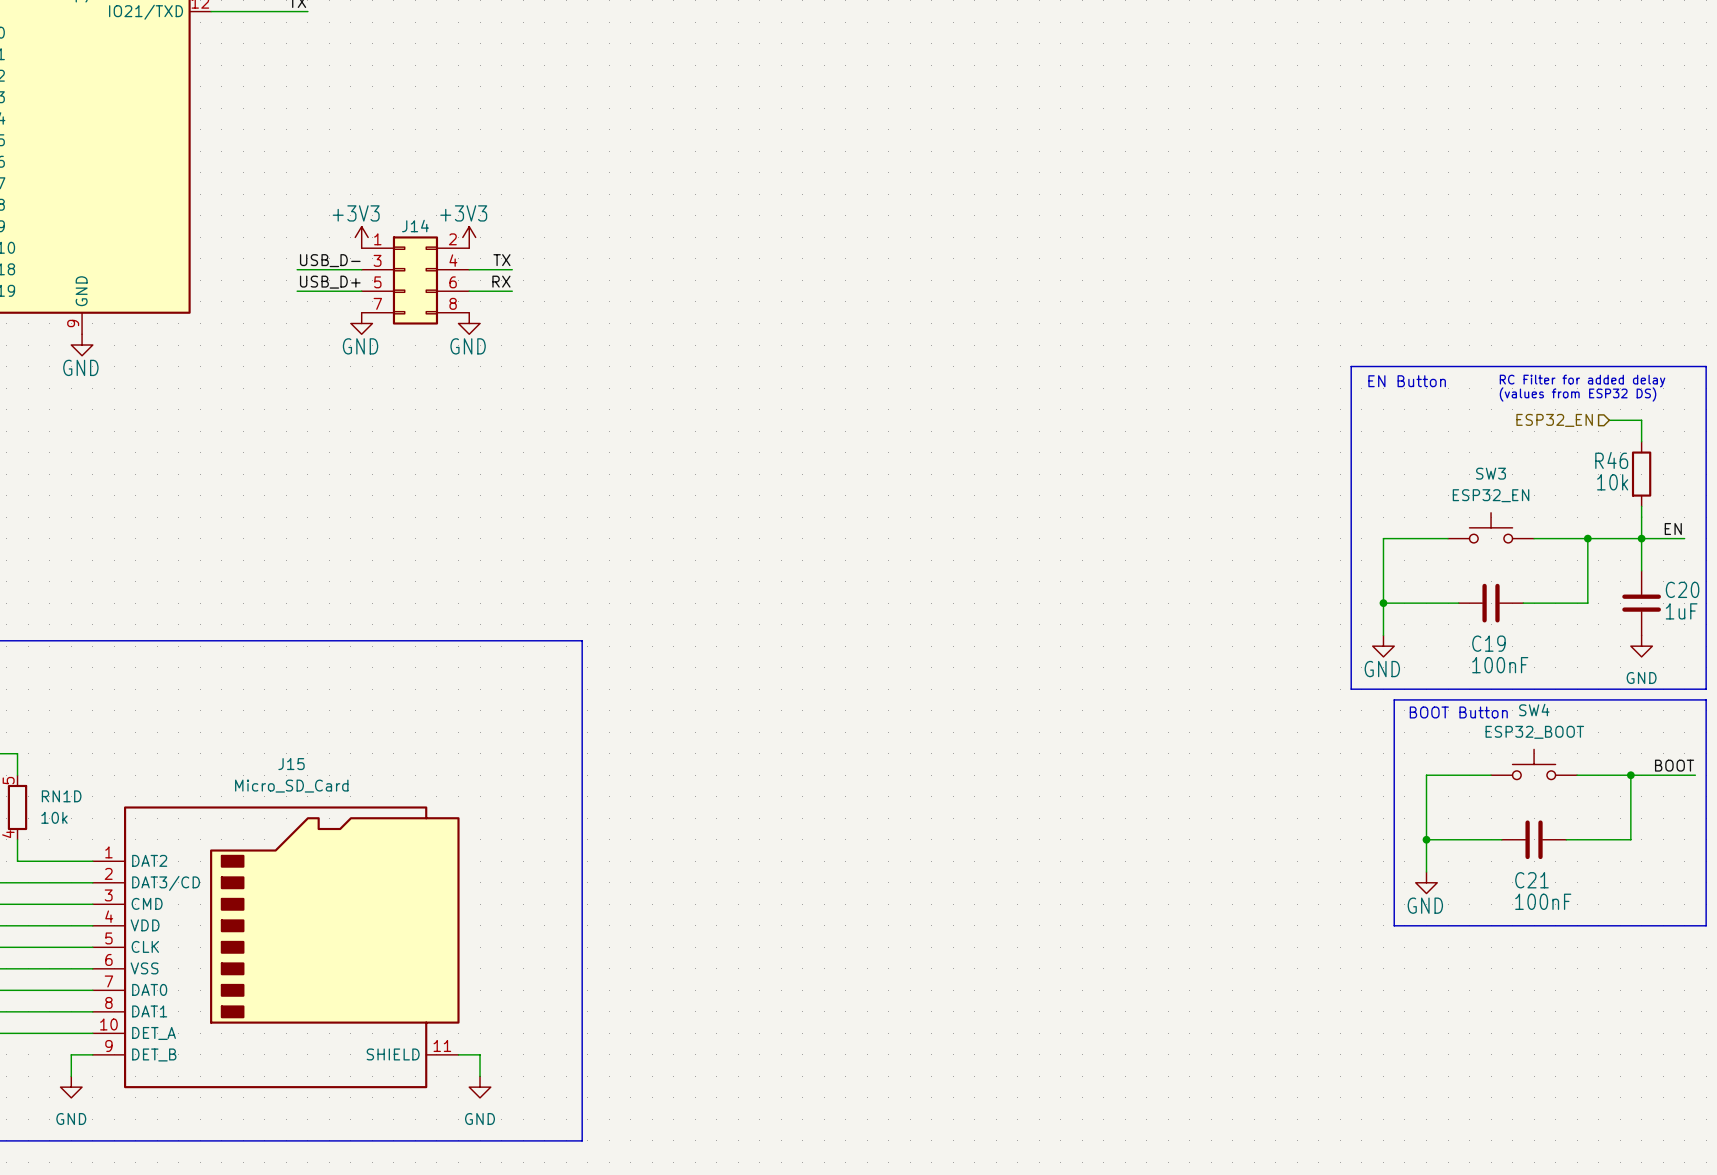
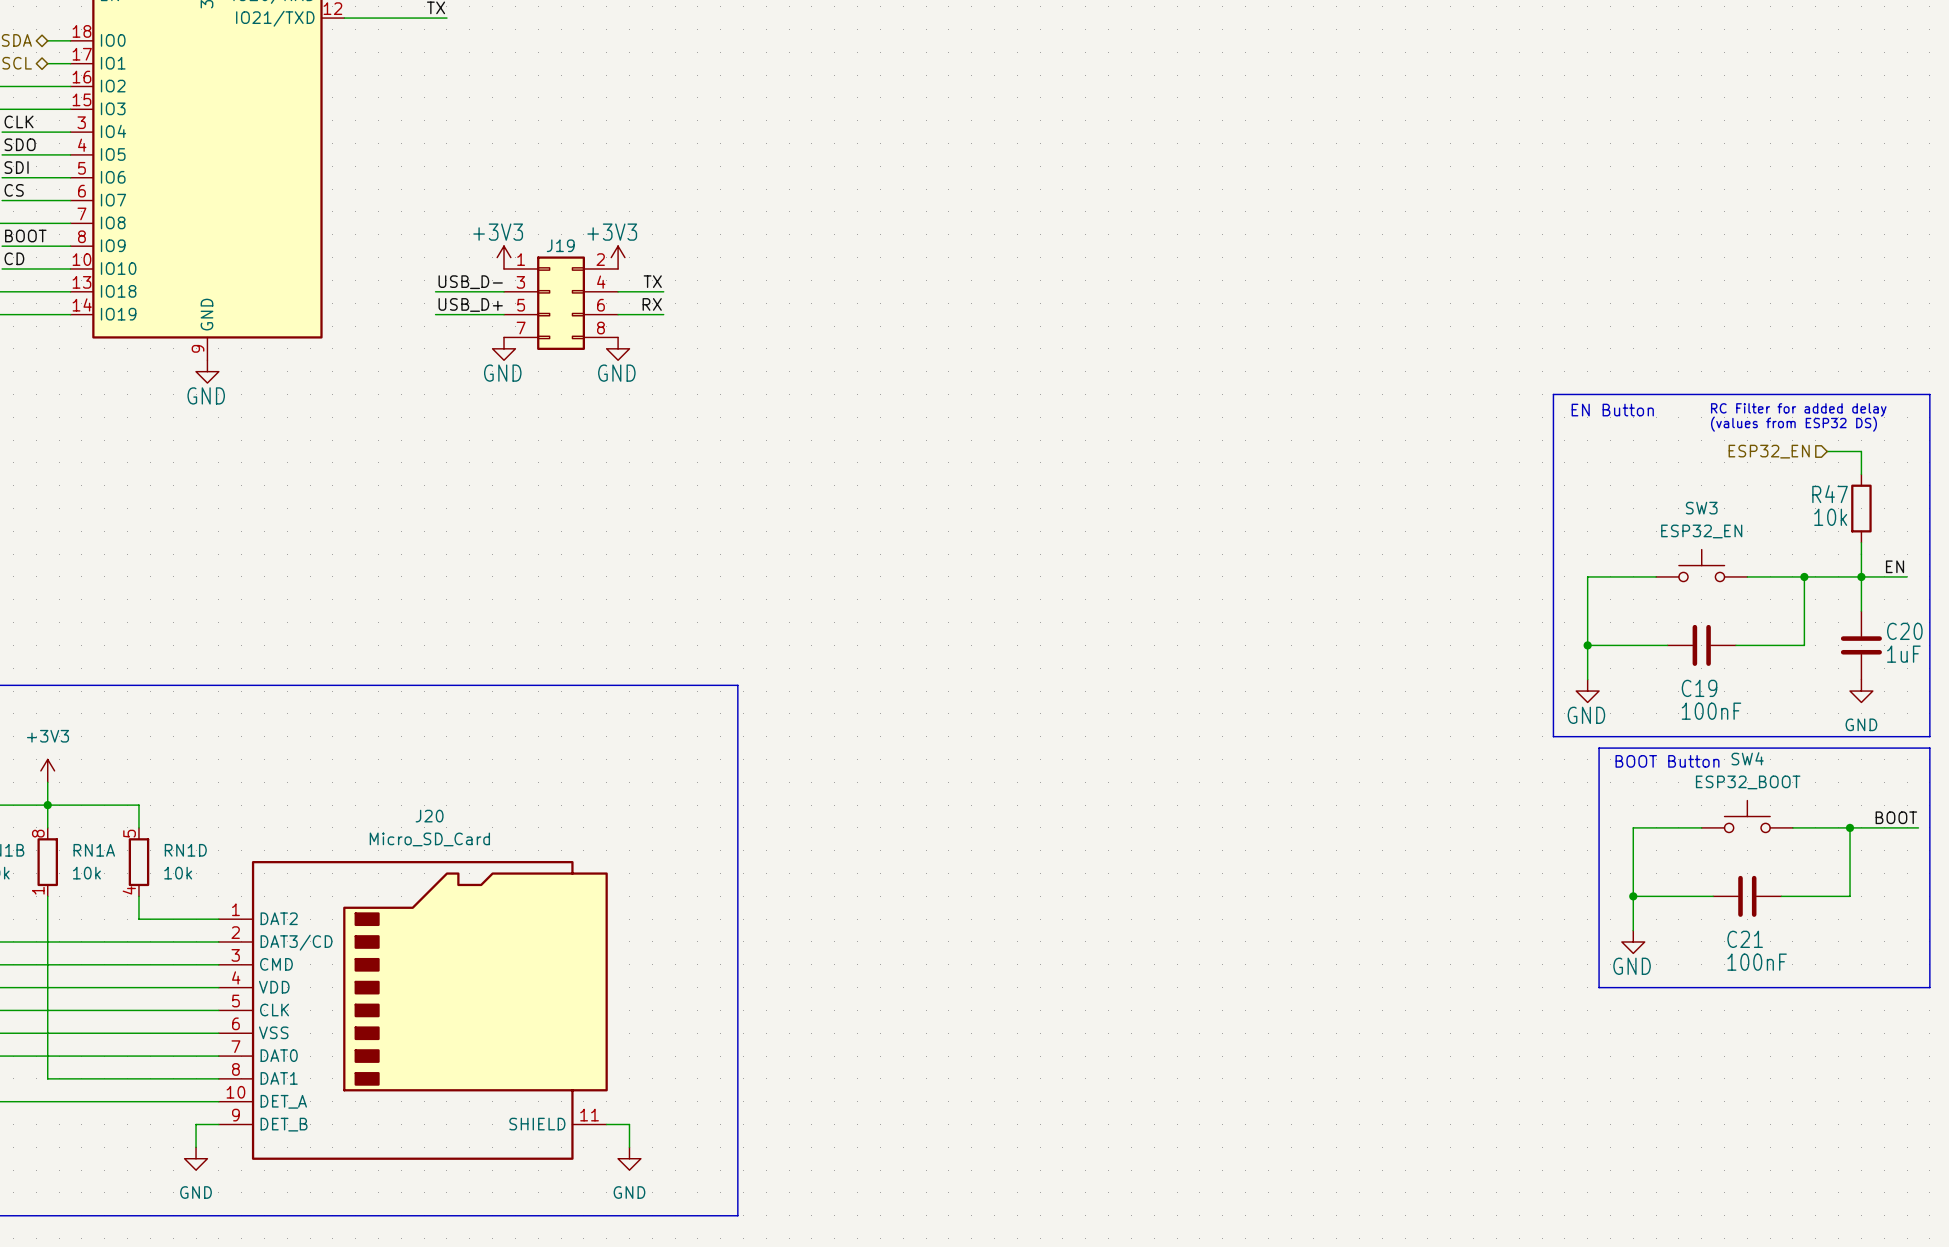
J14 name: J14 (415, 226) -> J19 (560, 245)
R46 name: R46 (1611, 460) -> R47 (1830, 494)
J15 name: J15 (291, 764) -> J20 (429, 816)

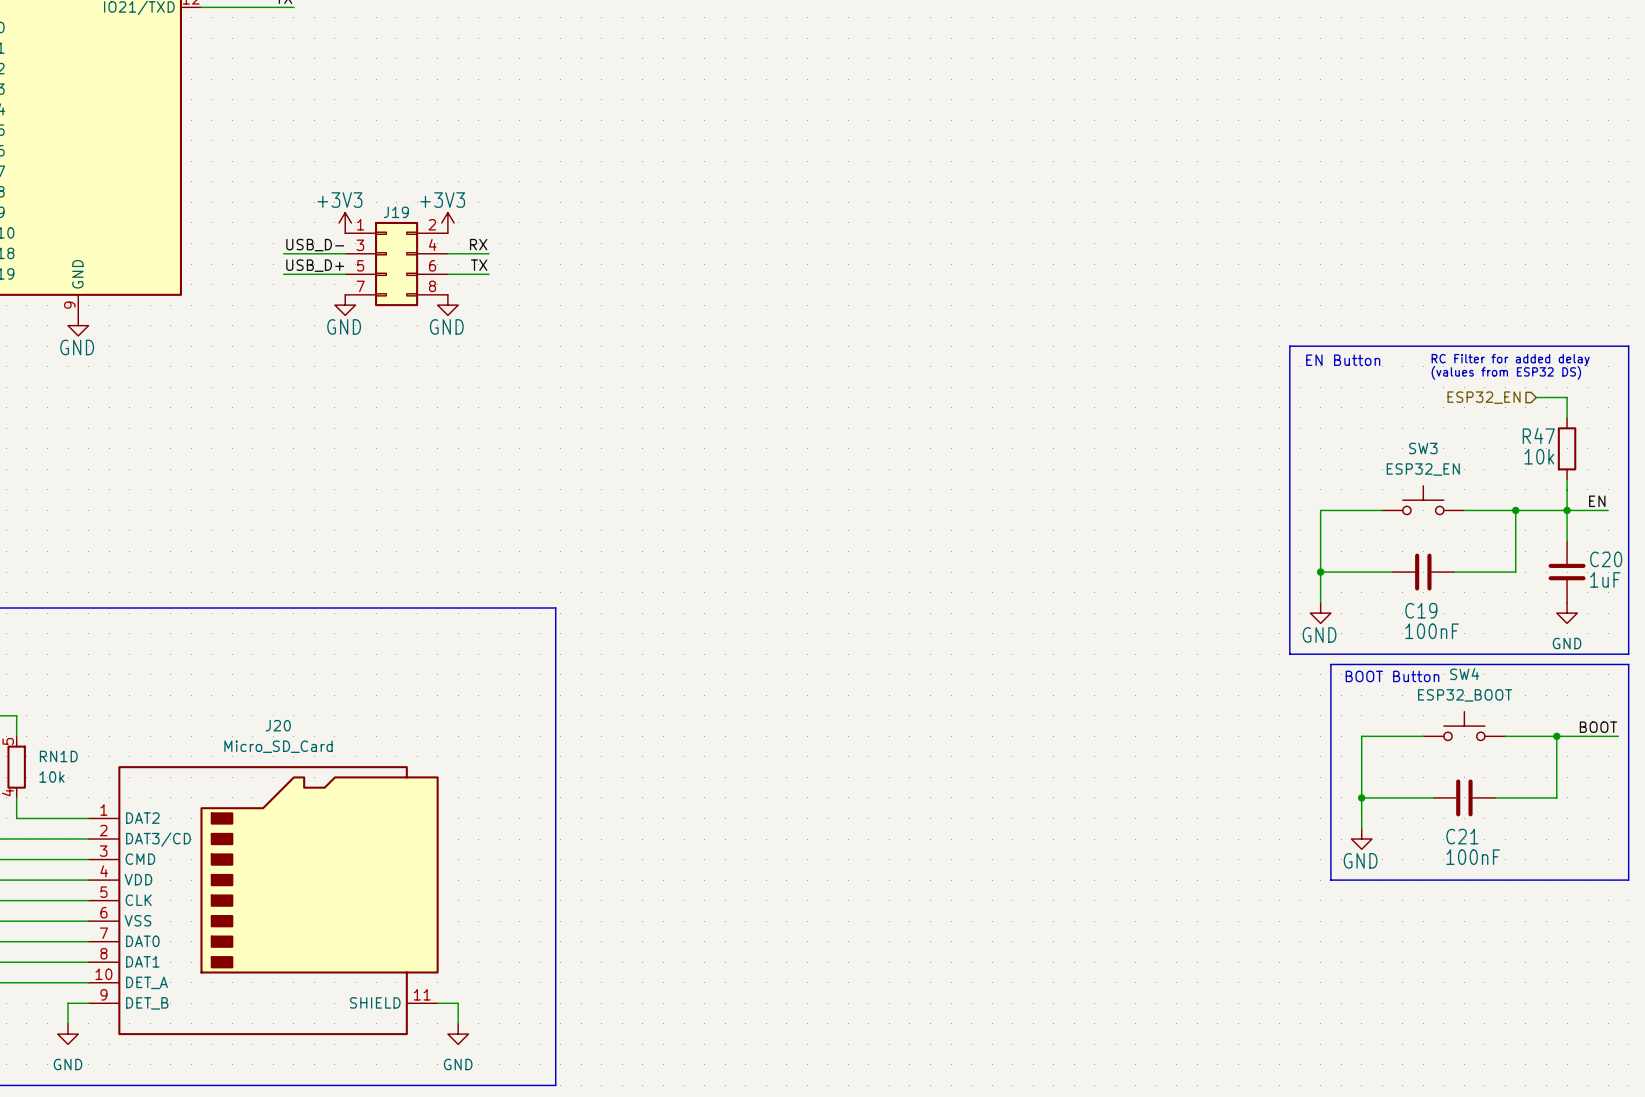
label: TX (652, 281) -> RX (478, 244)
label: RX (652, 304) -> TX (479, 265)

